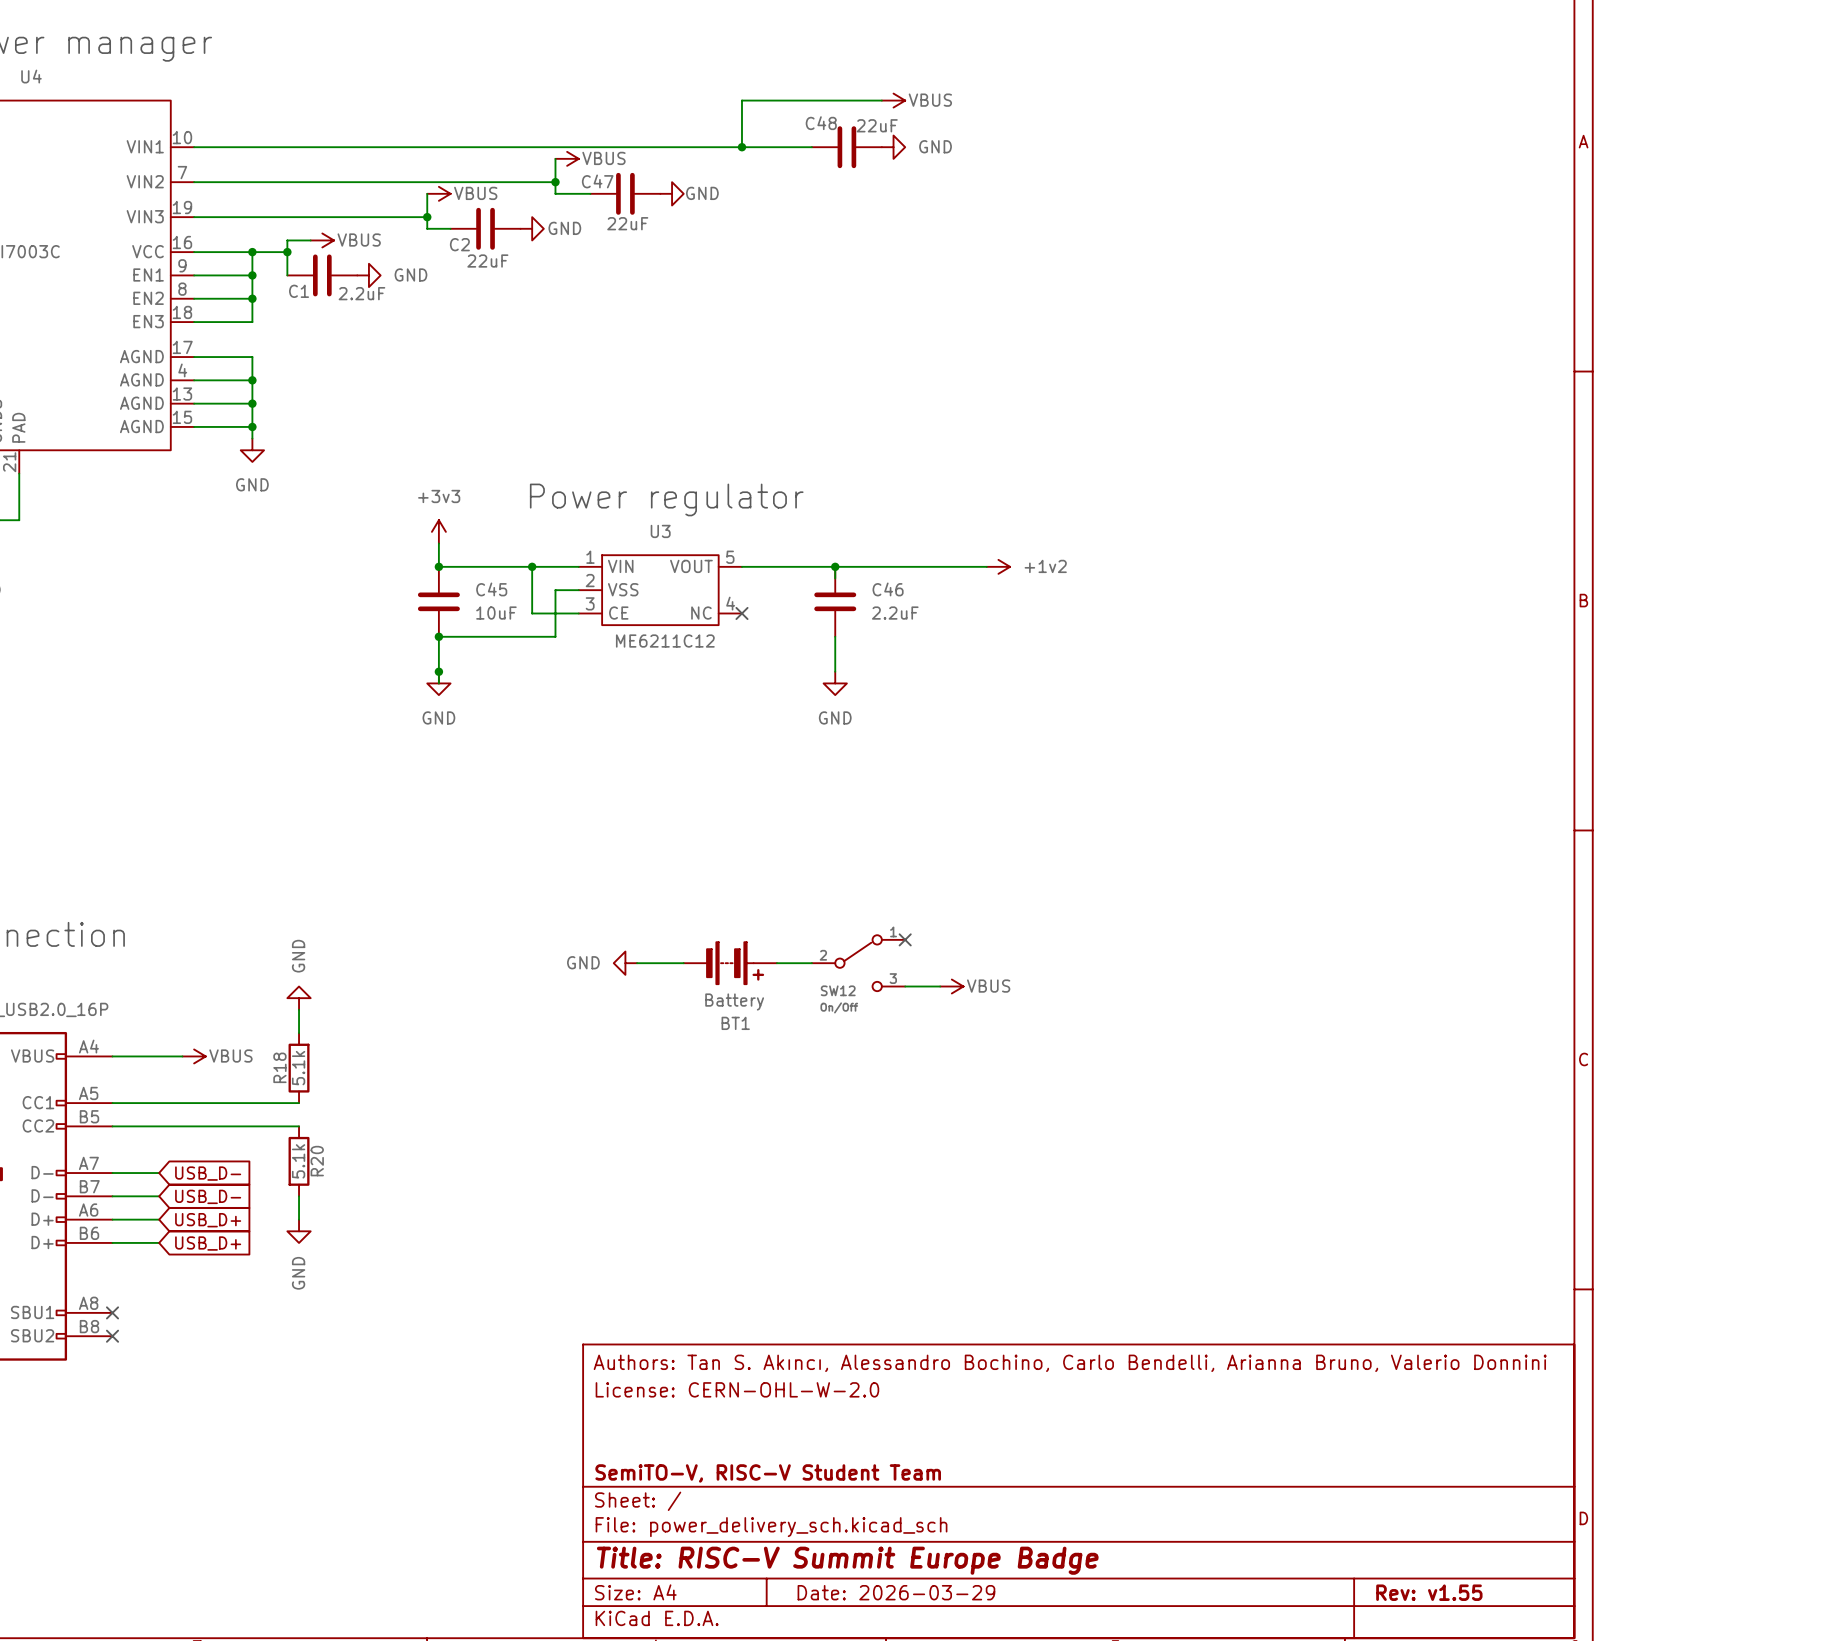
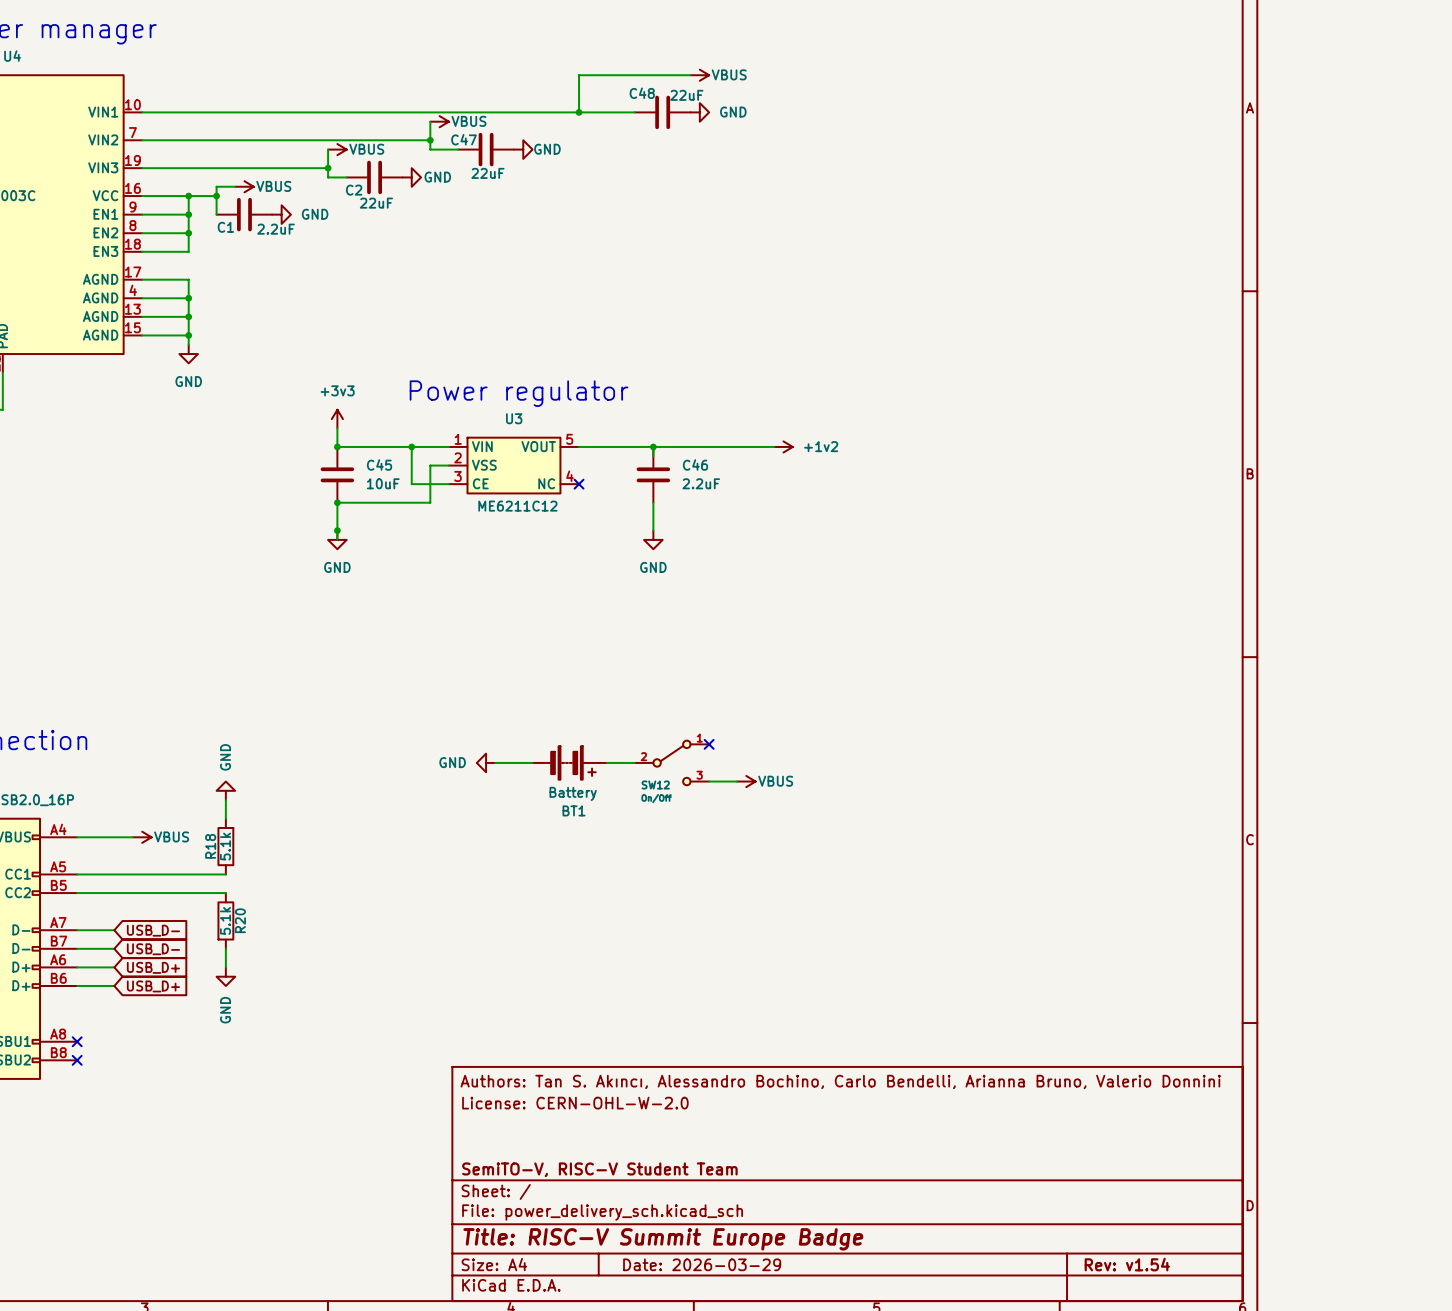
title block: Rev: v1.55 (1429, 1592) -> Rev: v1.54 (1127, 1264)

